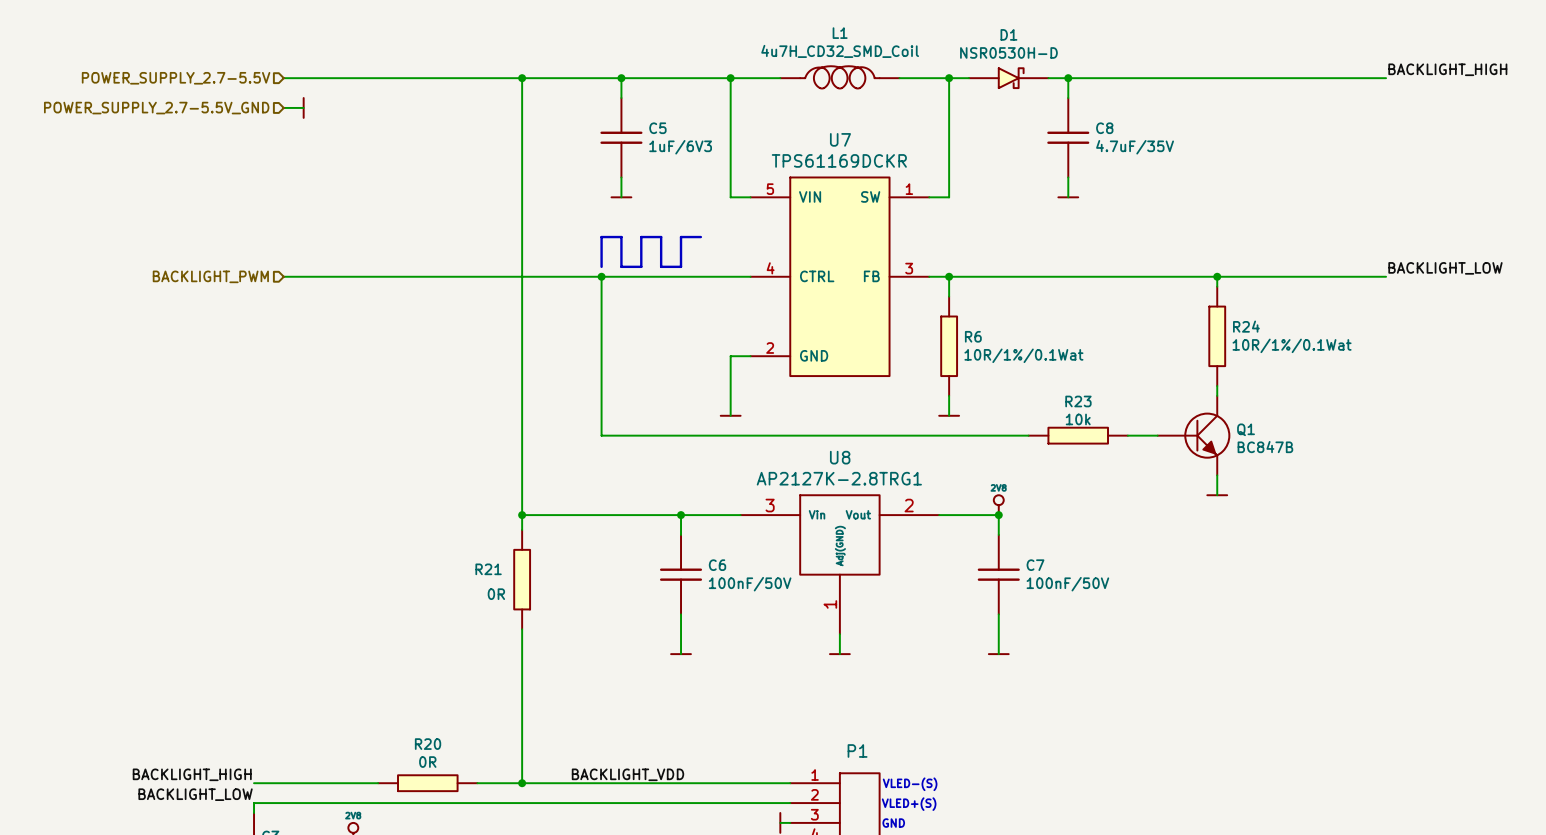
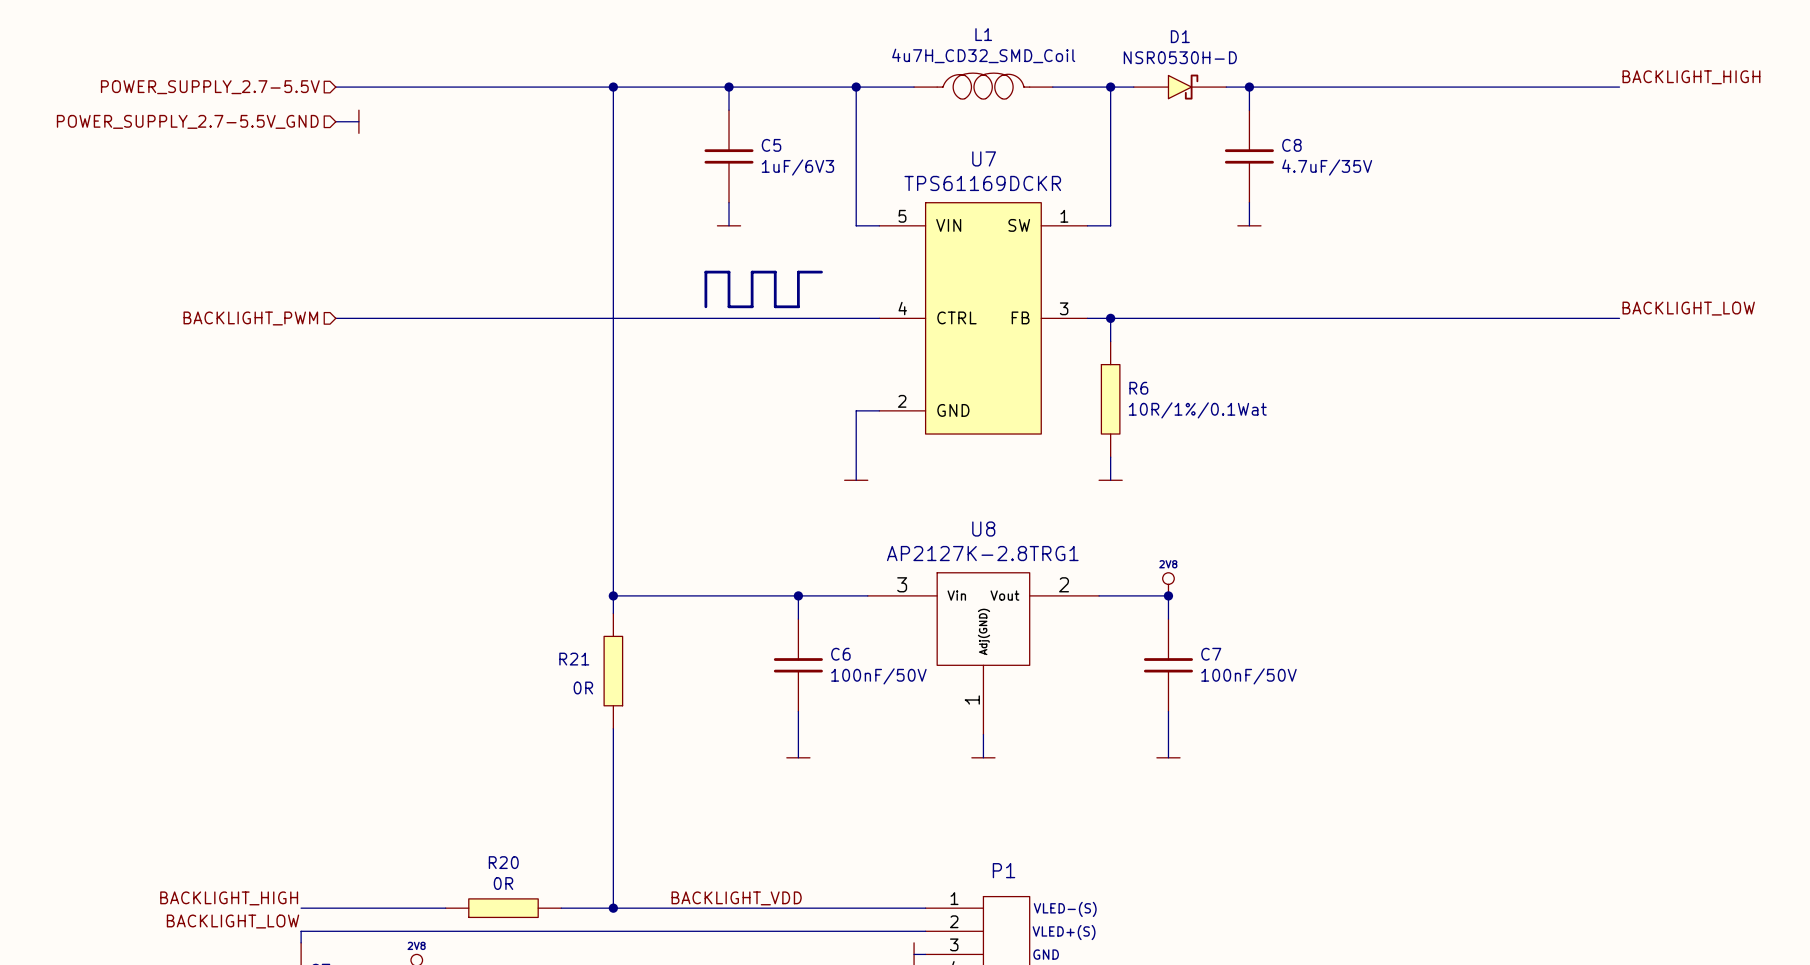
wire: (601, 276) (601, 435) (1028, 435) -> none
junction: (601, 276) -> none
wire: (1217, 276) (1217, 286) -> none
junction: (1217, 276) -> none
R24: 10R/1%/0.1Wat (1217, 336) -> none
wire: (1217, 386) (1217, 395) -> none
R23: 10k (1078, 435) -> none
wire: (1127, 435) (1157, 435) -> none
Q1: BC847B (1194, 435) -> none
wire: (1217, 475) (1217, 495) -> none
power symbol: (1217, 495) -> none

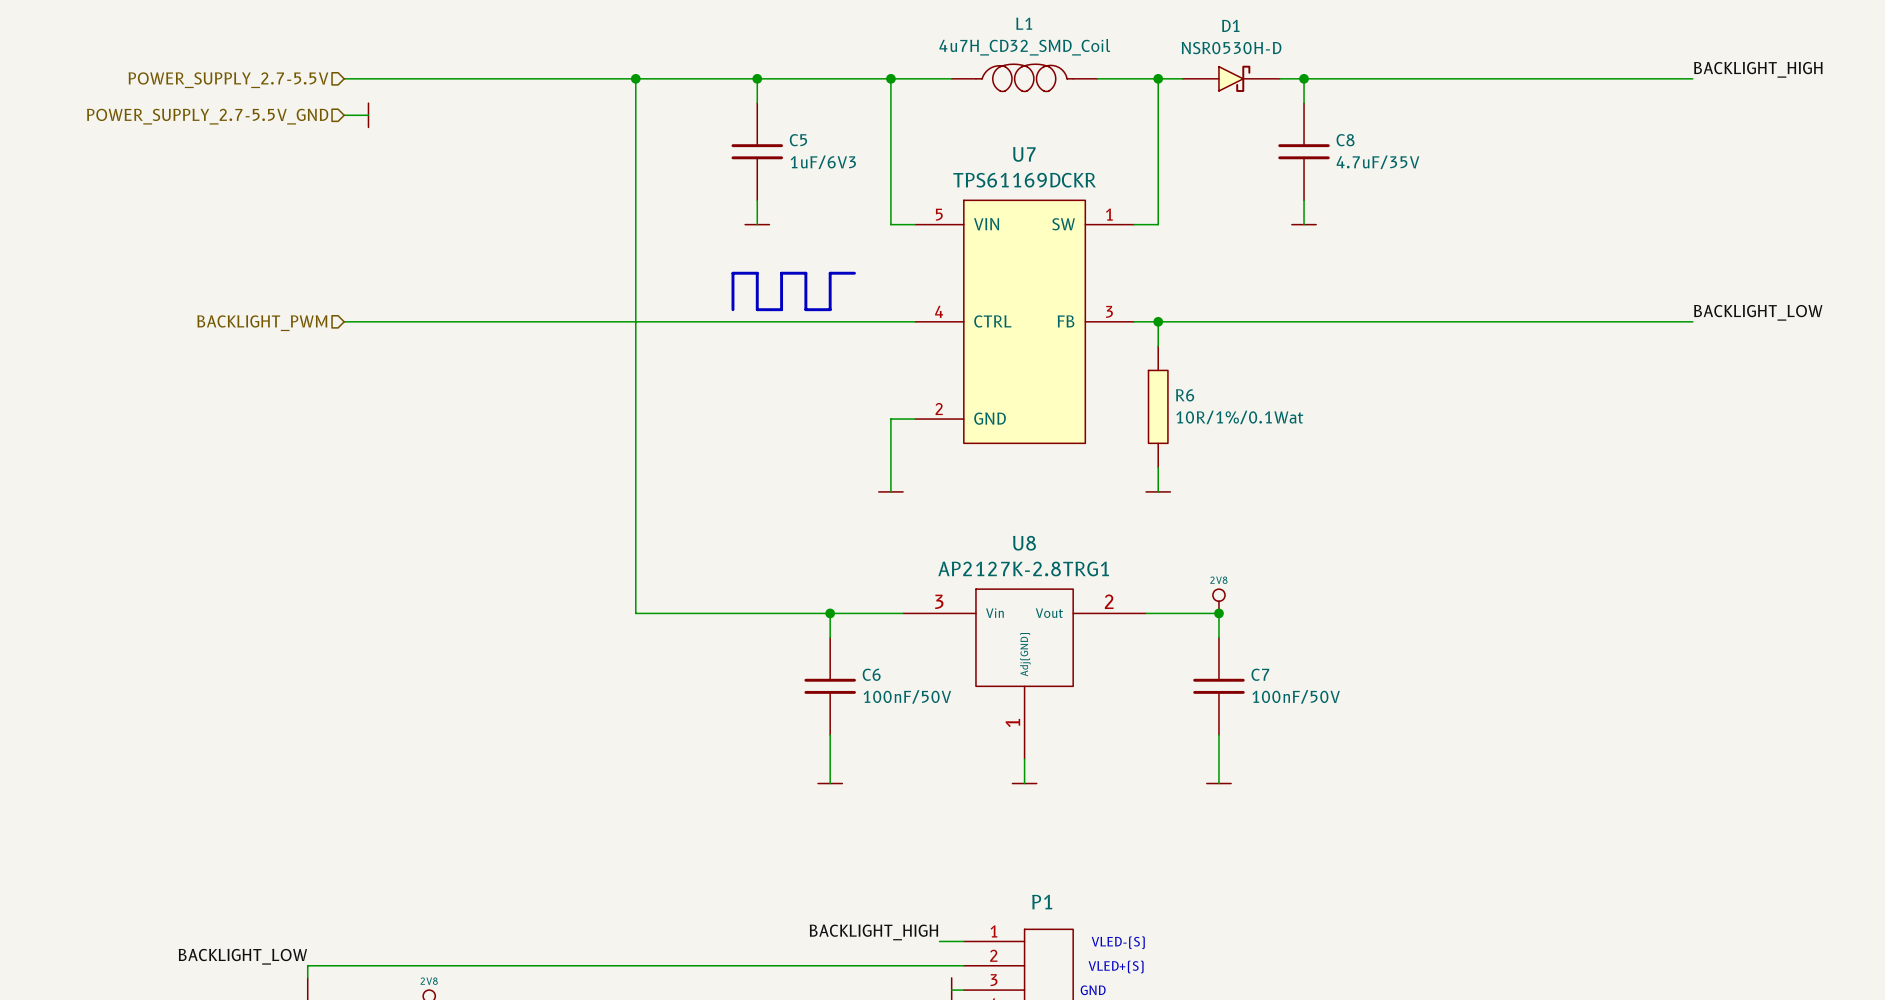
wire: (613, 595) (613, 613) -> none
junction: (613, 595) -> none
R21: 0R (613, 671) -> none
wire: (613, 728) (613, 908) -> none
label: BACKLIGHT_HIGH (229, 898) -> none
label: BACKLIGHT_VDD (736, 898) -> BACKLIGHT_HIGH (873, 932)
wire: (301, 908) (445, 908) -> none
R20: 0R (503, 908) -> none
wire: (561, 908) (902, 908) -> none
junction: (613, 908) -> none

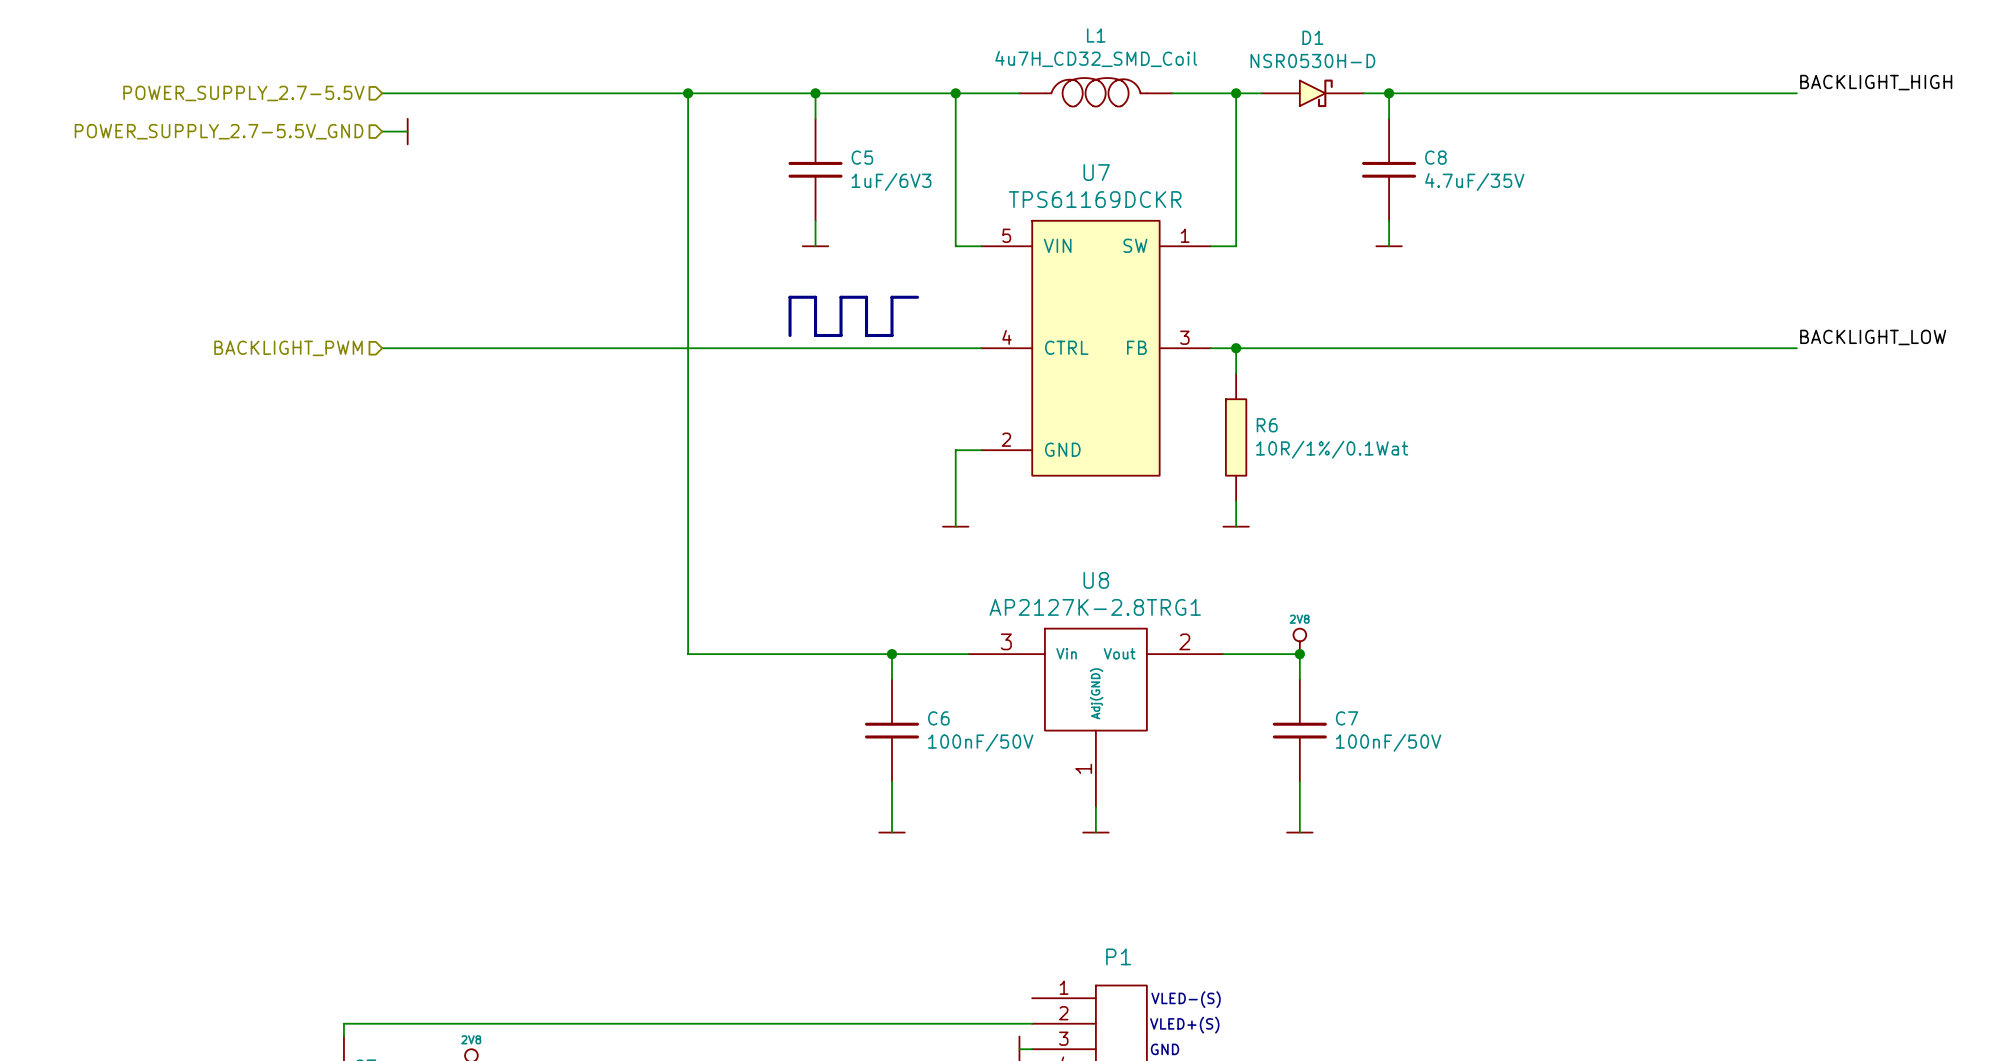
label: BACKLIGHT_HIGH (873, 932) -> none
wire: (939, 941) (963, 941) -> none
label: BACKLIGHT_LOW (242, 956) -> none

